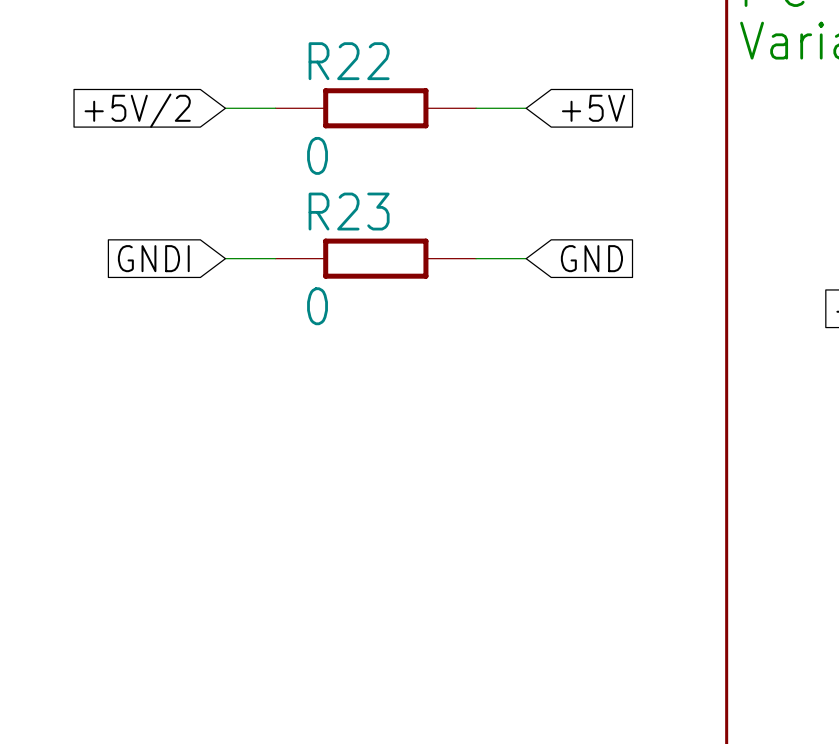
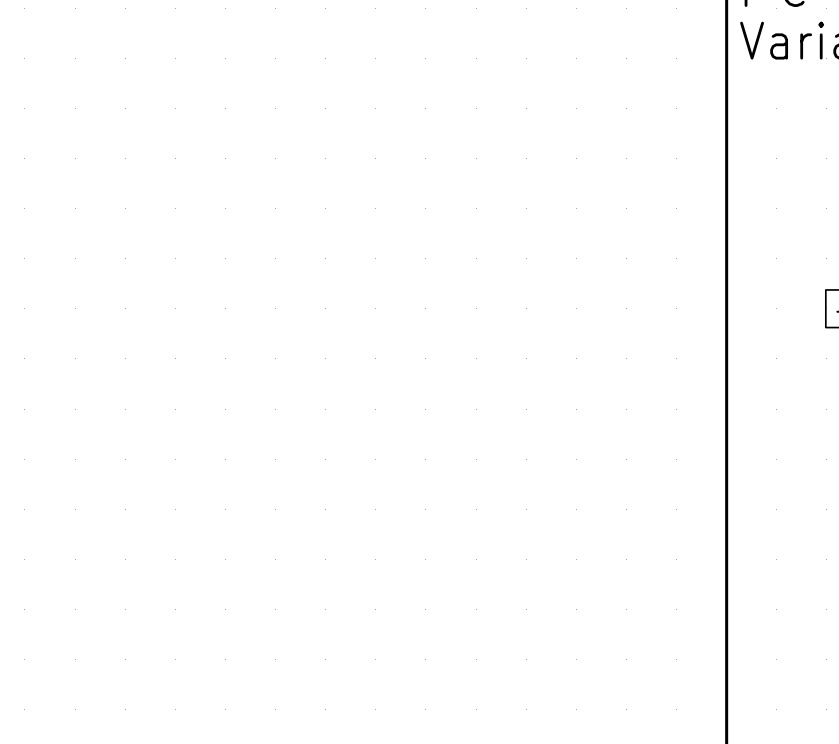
wire: (225, 108) (275, 108) -> none
R22: 0 (375, 108) -> none
wire: (476, 108) (526, 108) -> none
global label: +5V (593, 108) -> none
global label: +5V/2 (137, 110) -> none
global label: GNDI (153, 258) -> none
wire: (225, 258) (275, 258) -> none
R23: 0 (375, 258) -> none
wire: (476, 258) (526, 258) -> none
global label: GND (591, 258) -> none

